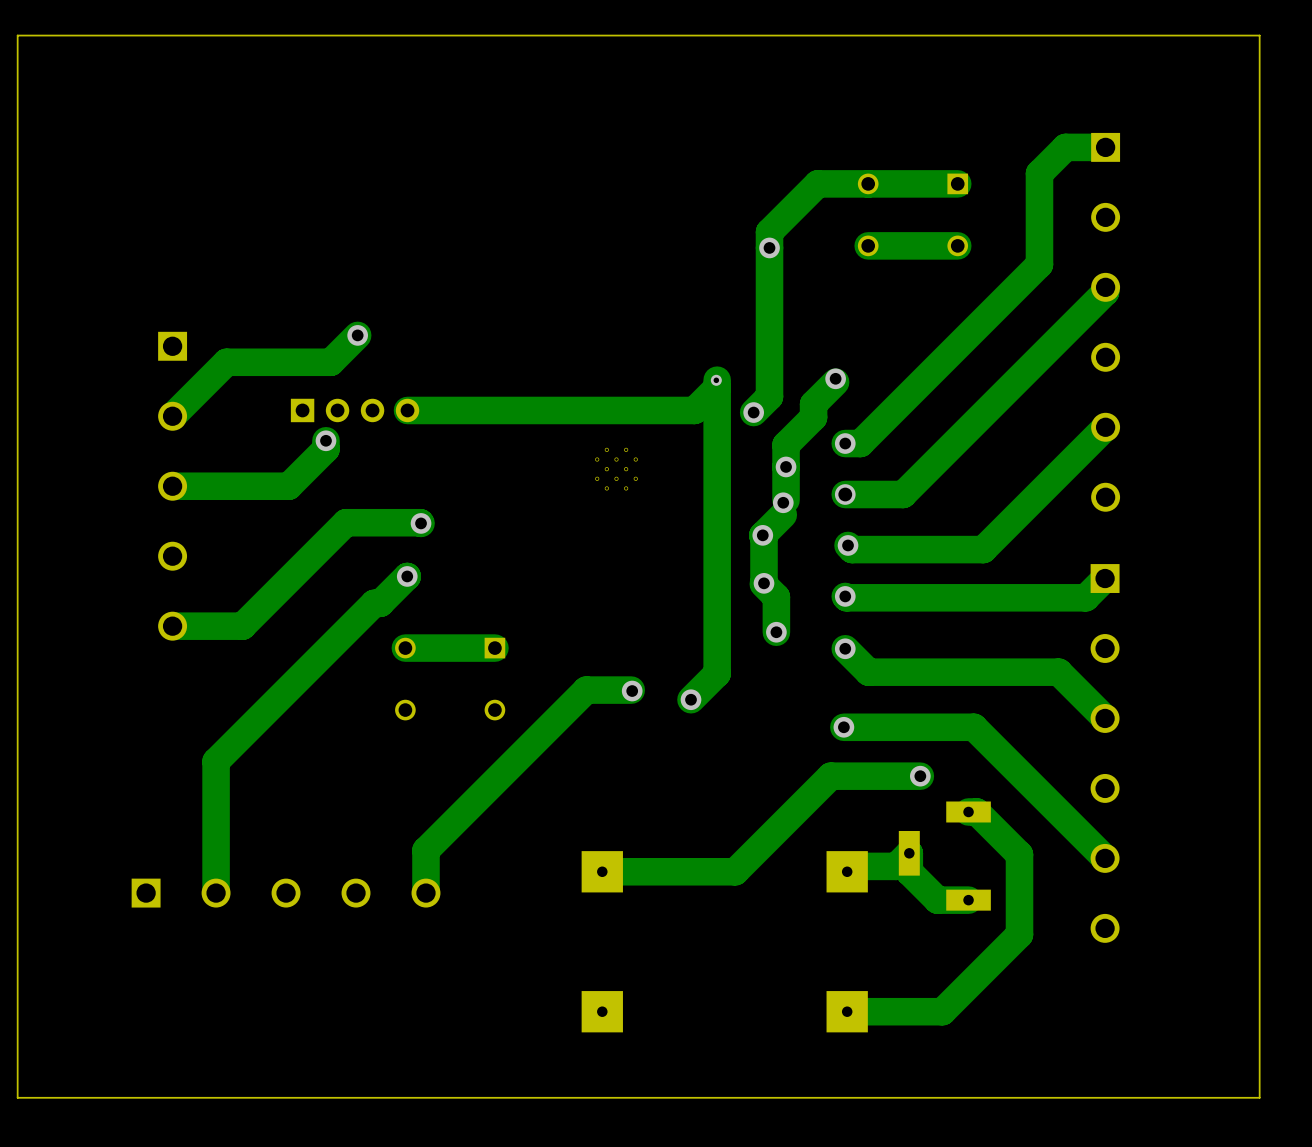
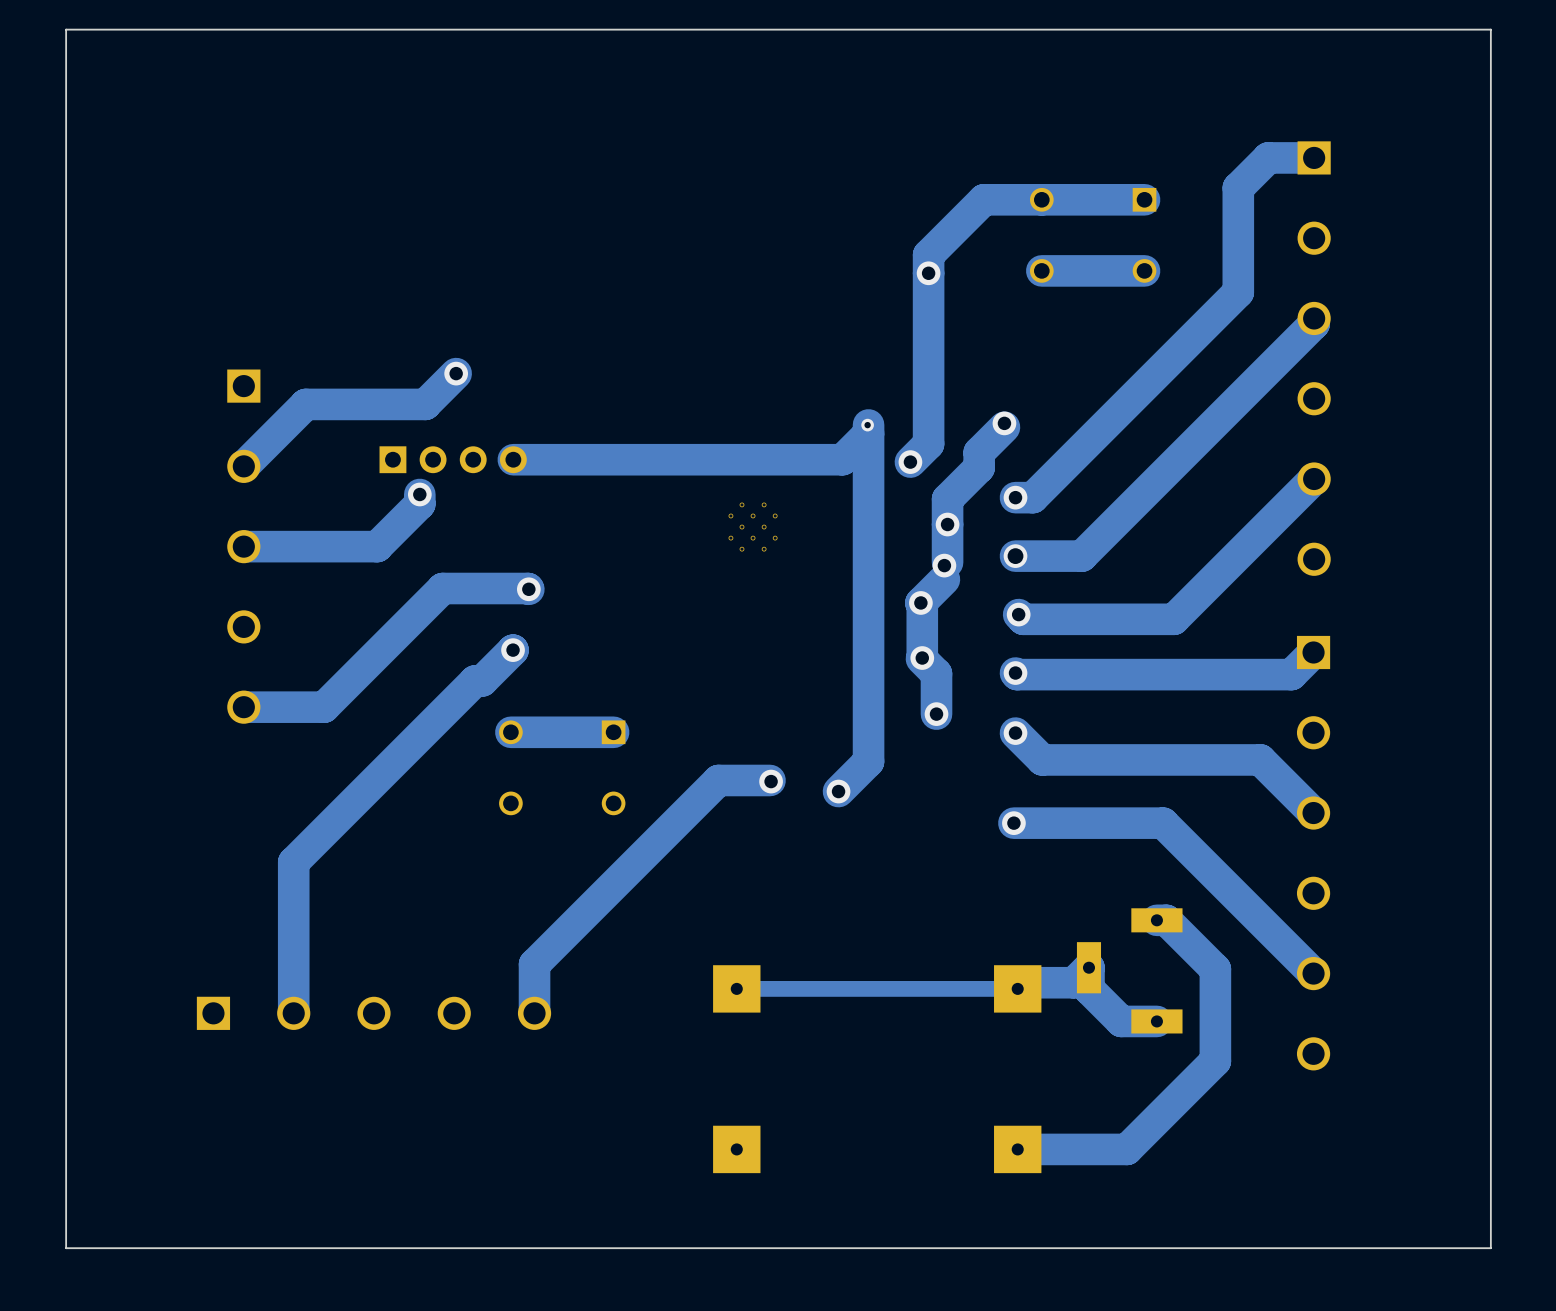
track: (920, 776) (830, 776) (735, 871) -> (1017, 988) (889, 988)
via: (920, 776) -> none
track width: thick (735, 871) (602, 871) -> thin (889, 988) (736, 988)

